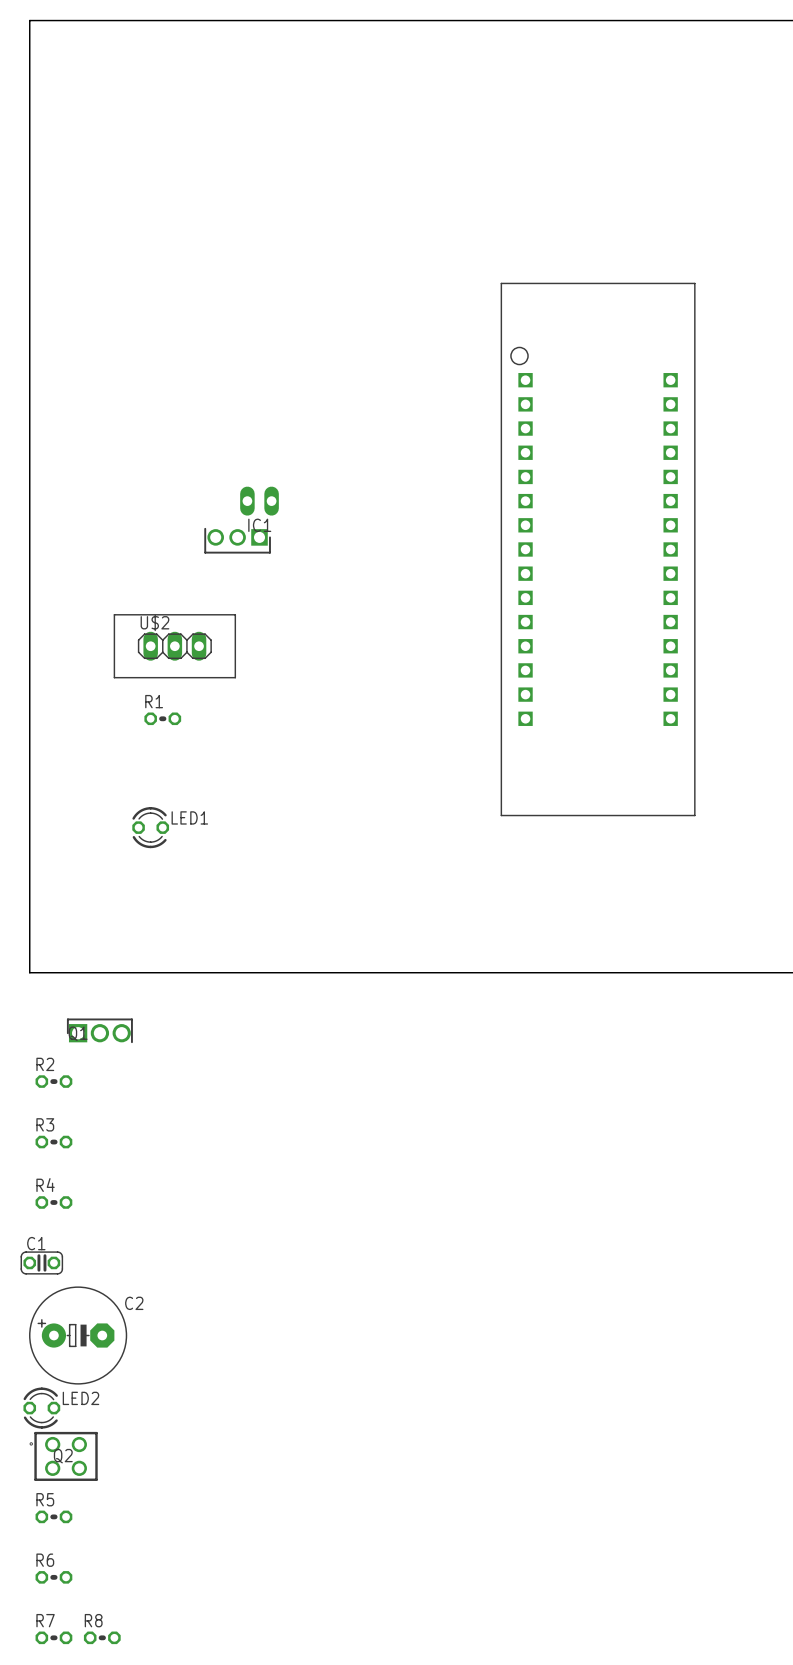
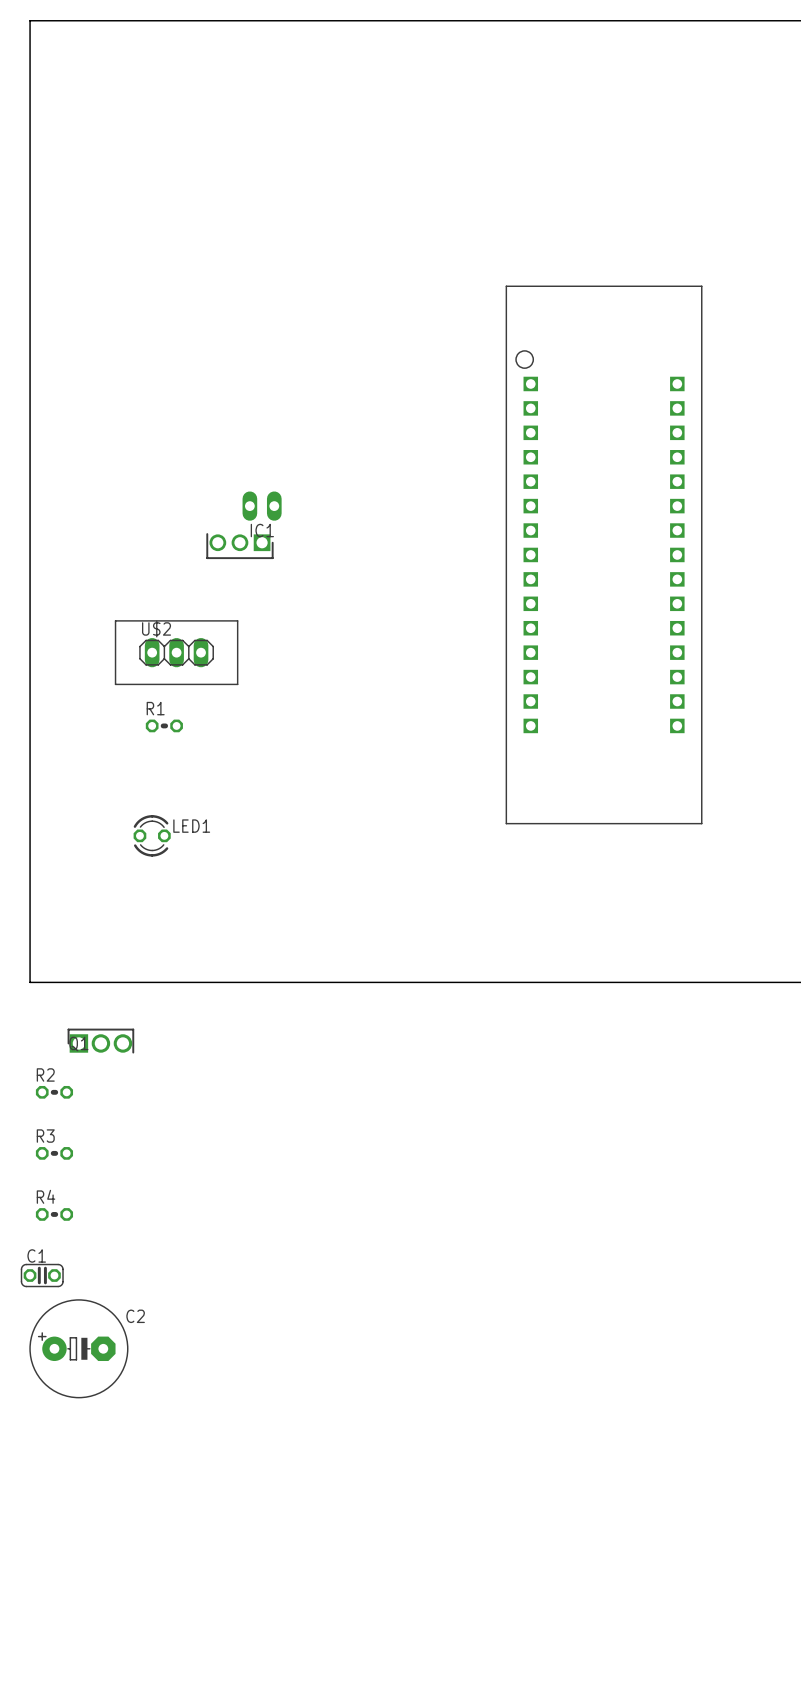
LED2: (41, 1408) -> none
Q2: (63, 1456) -> none
R5: (53, 1516) -> none
R6: (53, 1577) -> none
R7: (53, 1637) -> none
R8: (102, 1637) -> none

